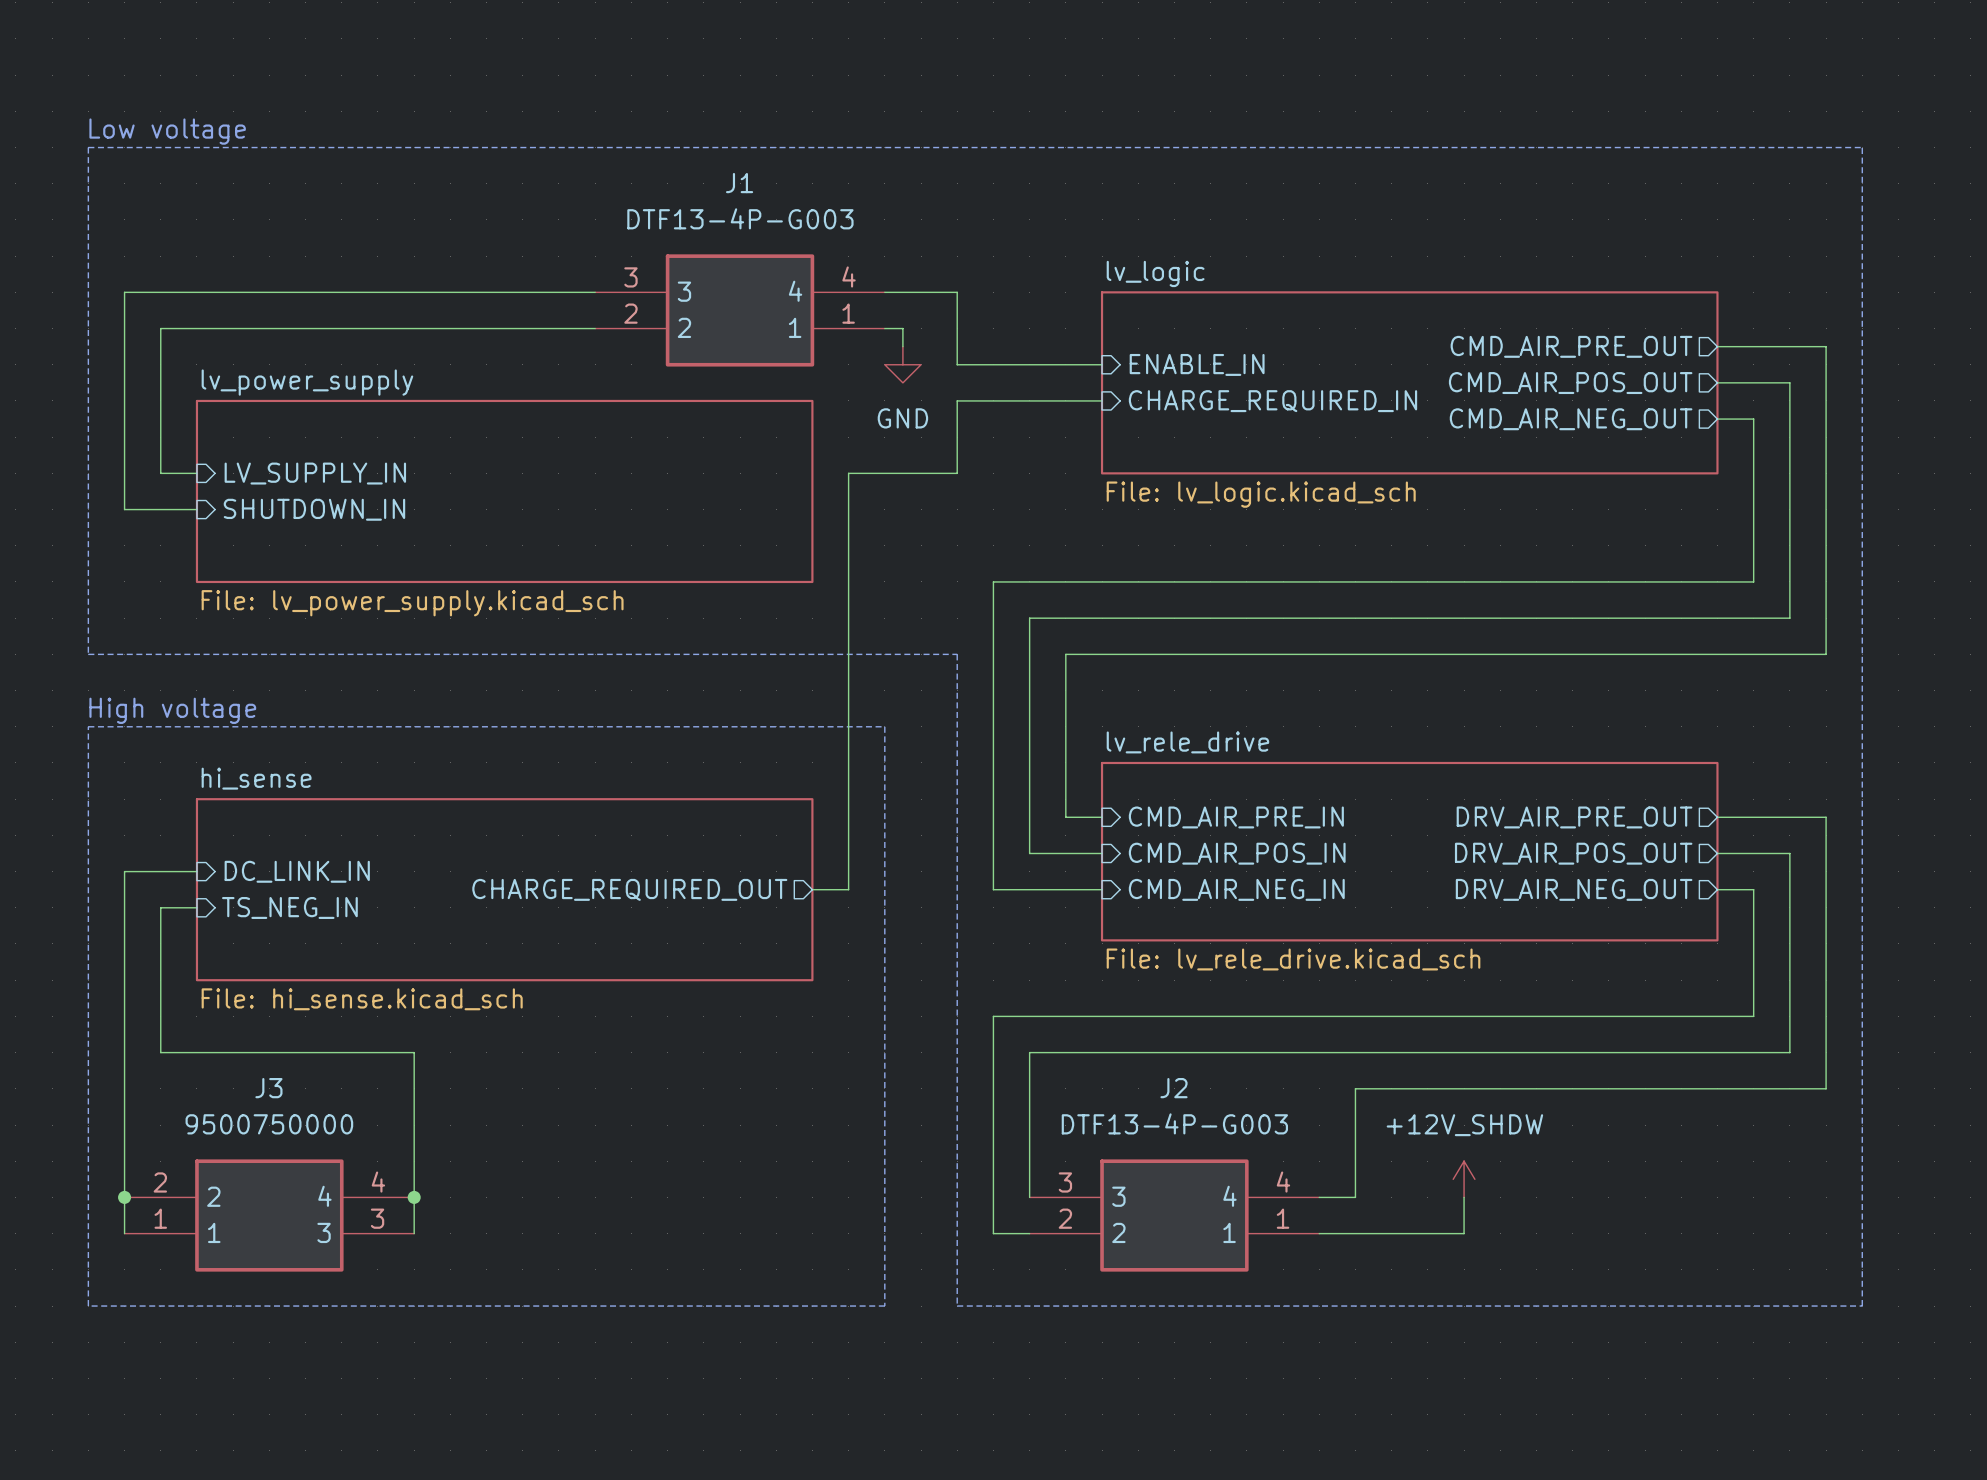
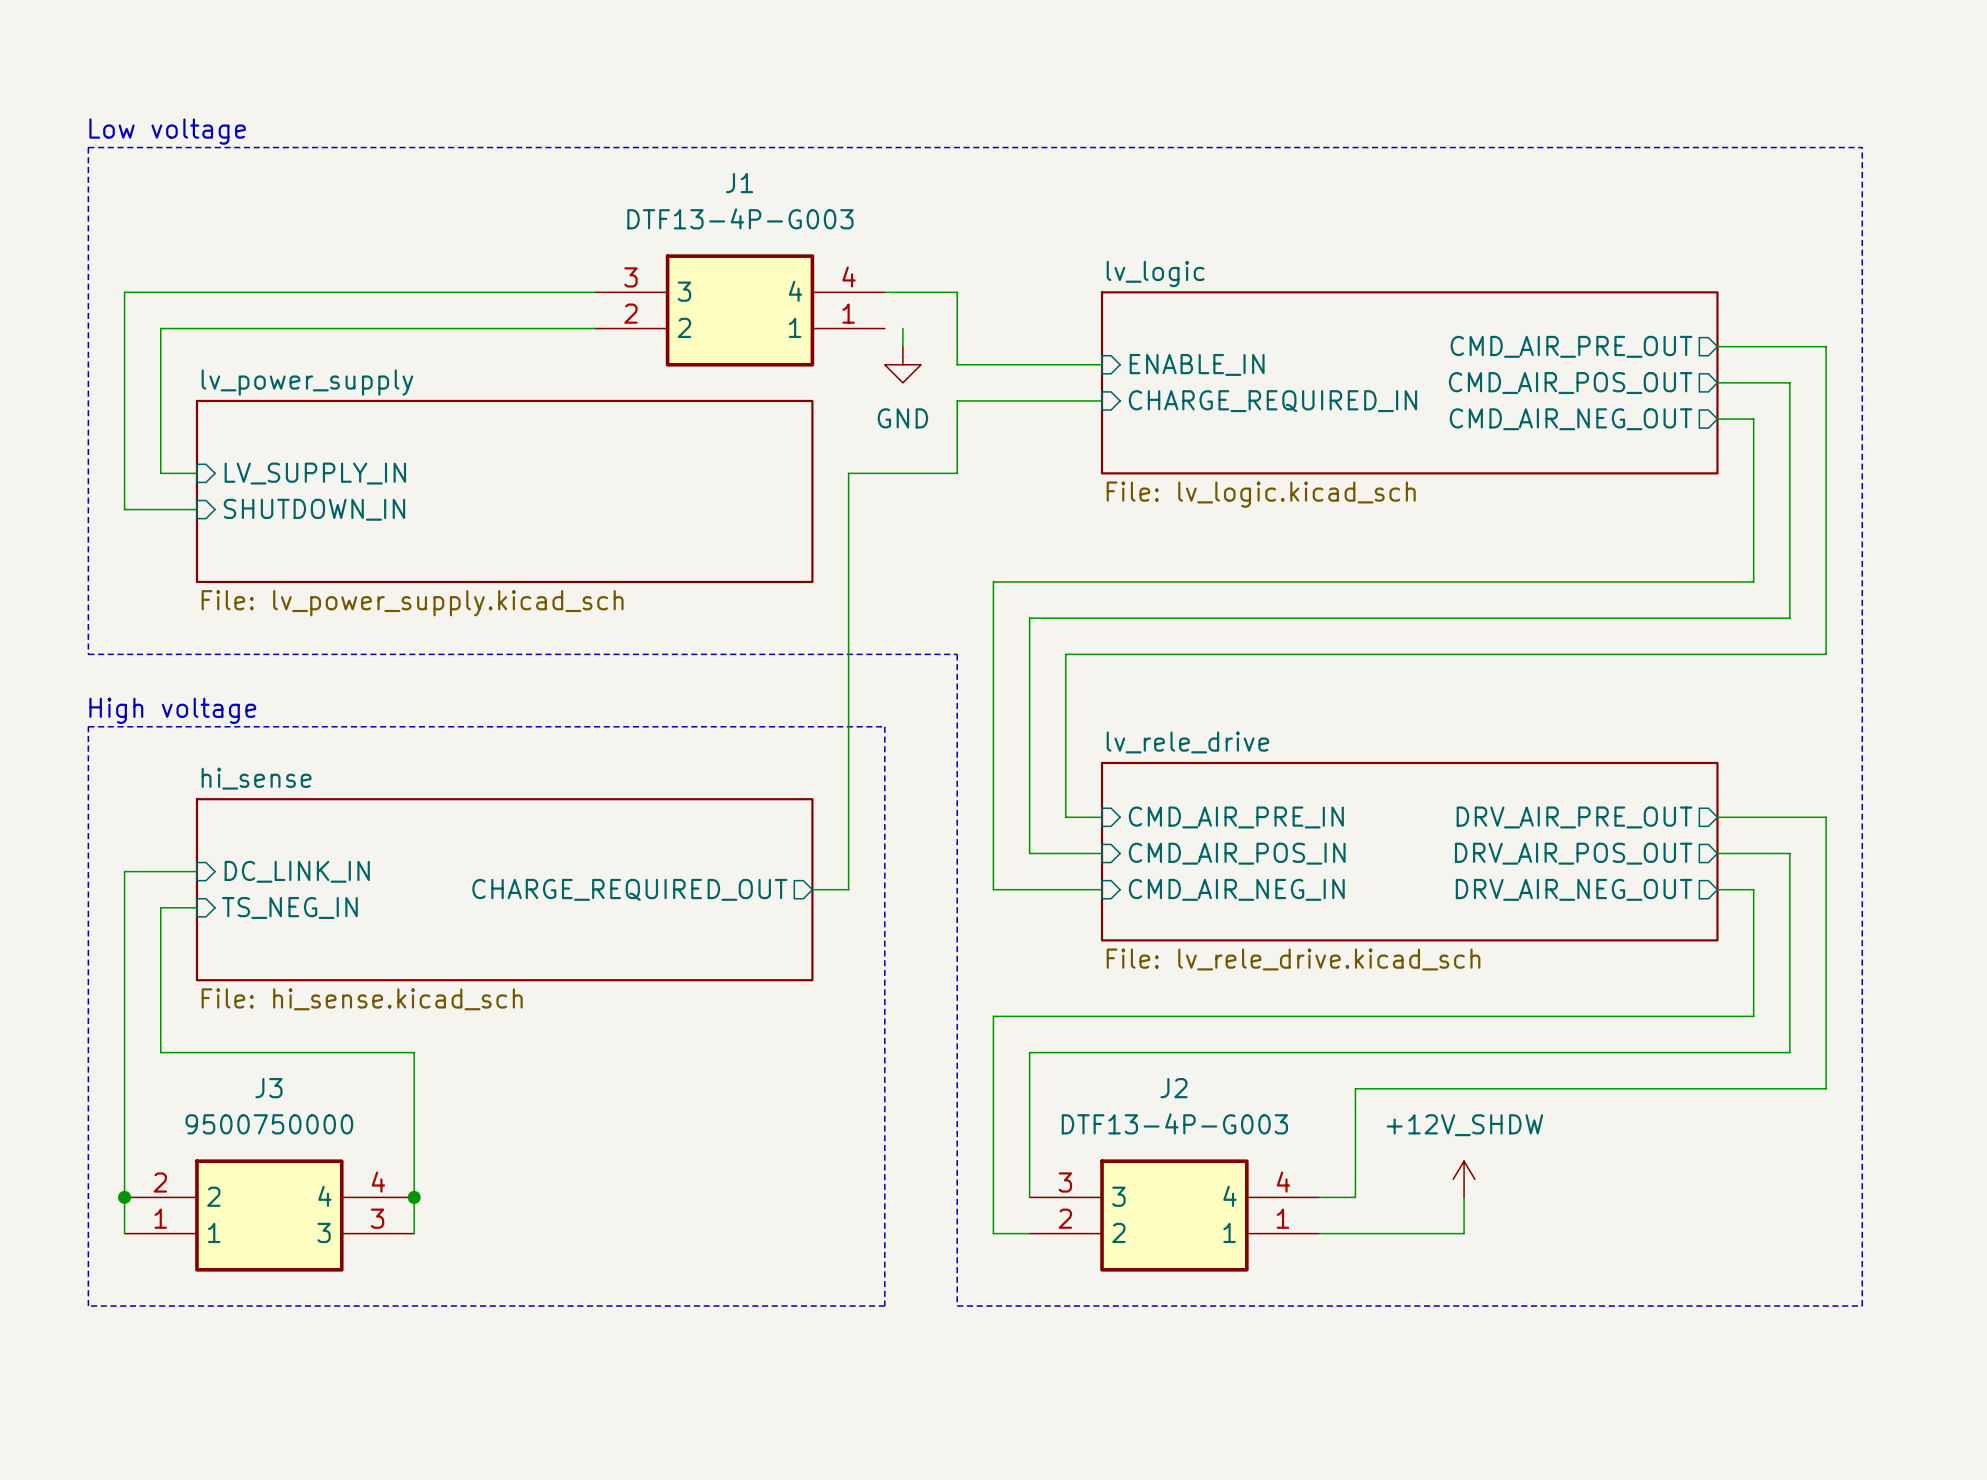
wire: (884, 328) (902, 328) -> none

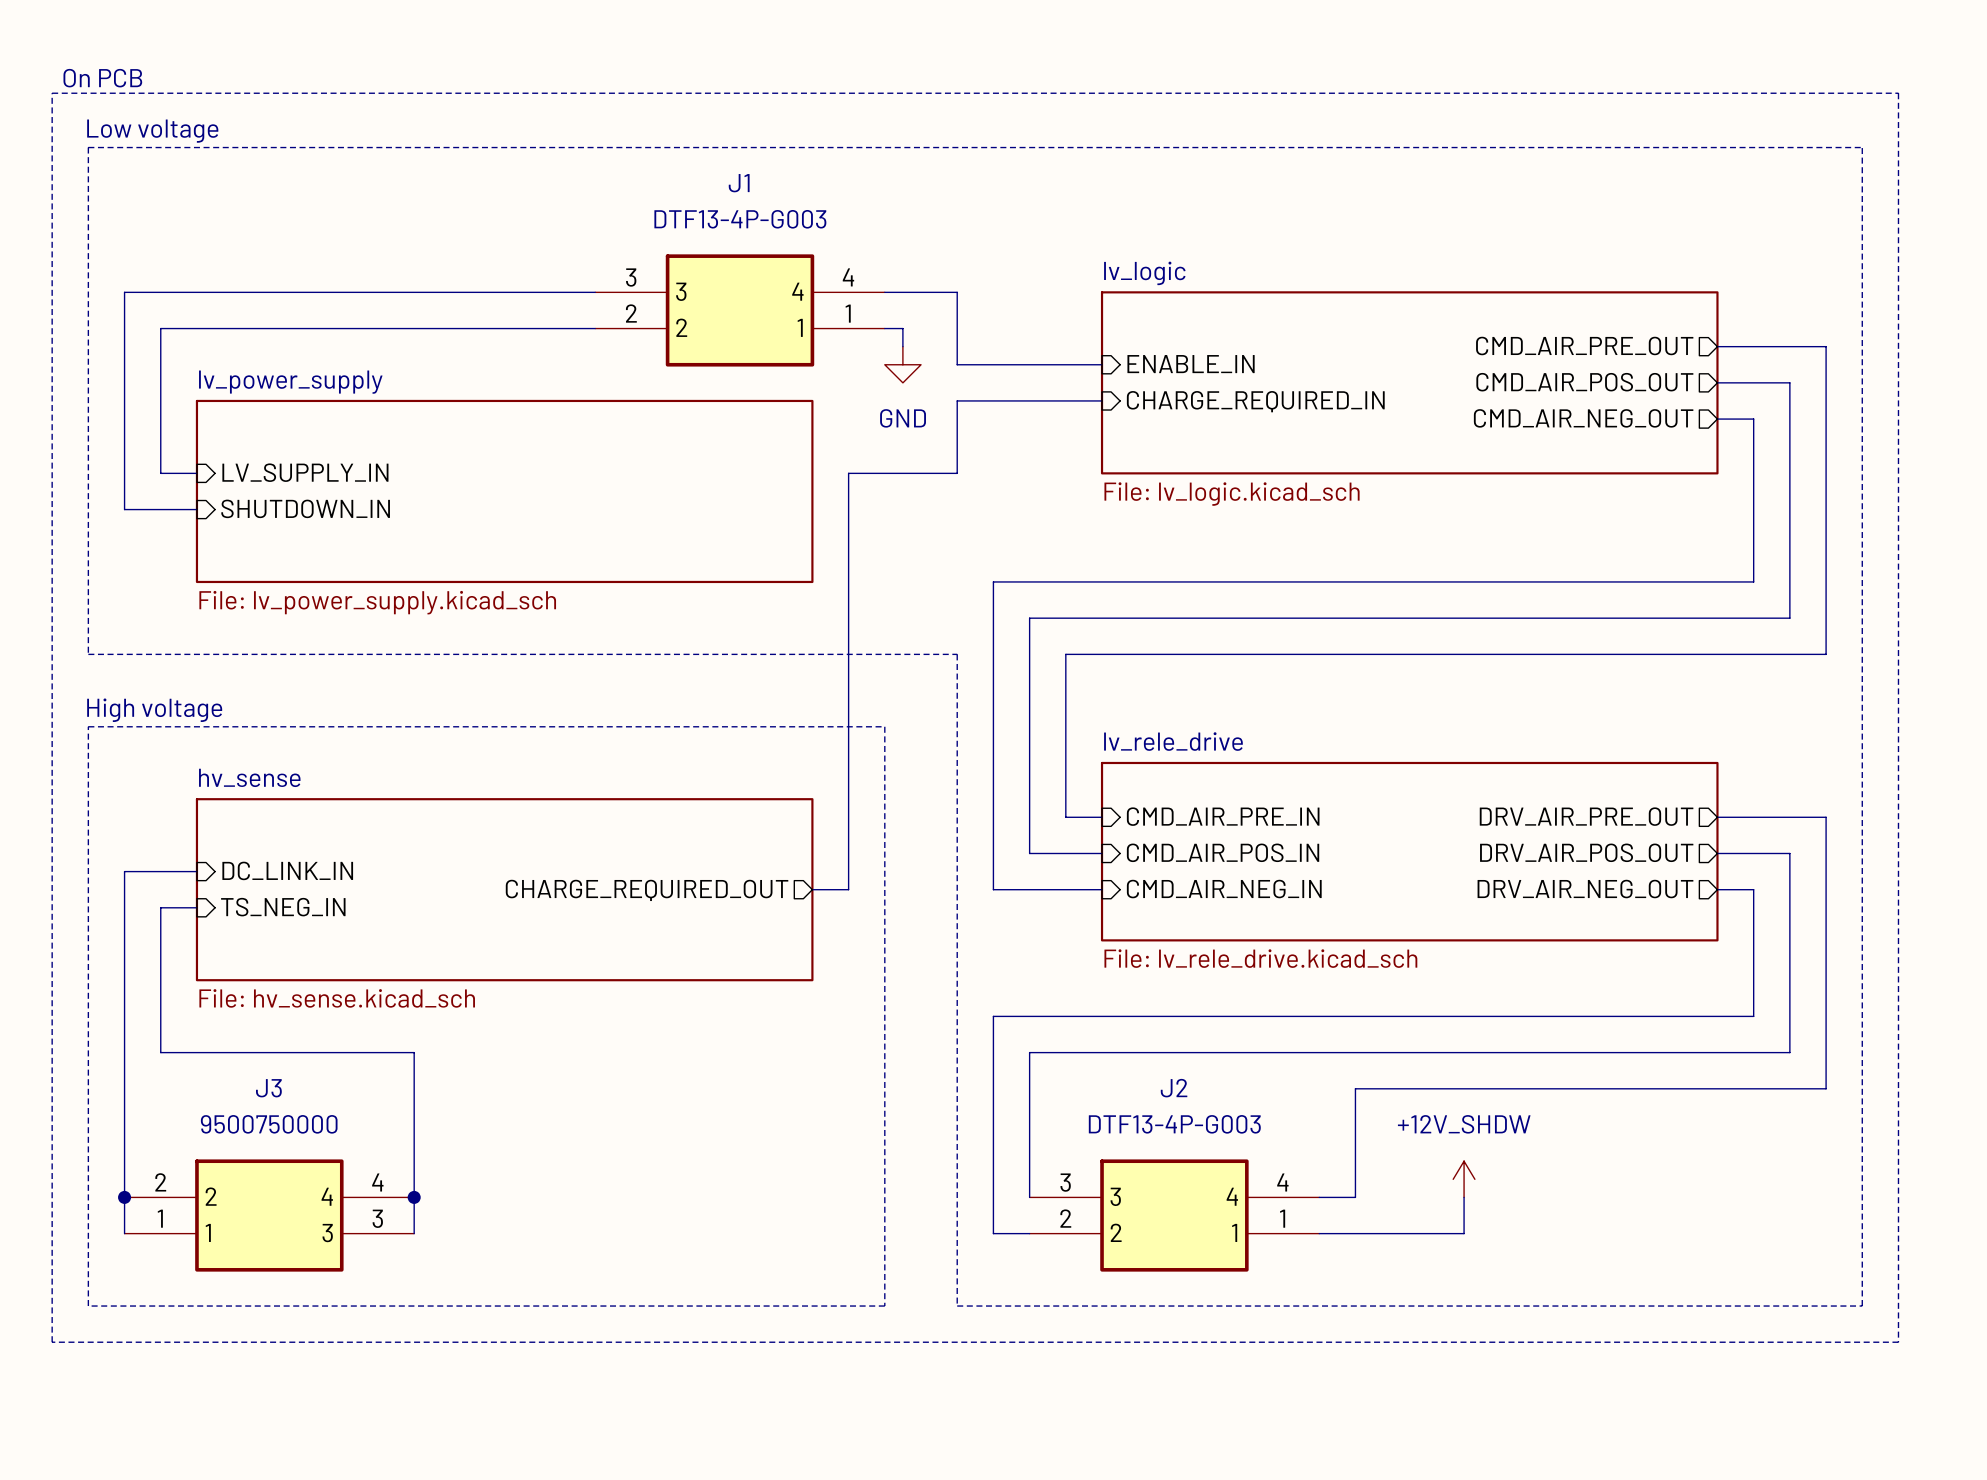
text: none -> On PCB (102, 78)
line: none -> (52, 93) (1898, 93) (1898, 1342) (52, 1342) (52, 93)
wire: none -> (884, 328) (902, 328)
sheet hi_sense name: hi_sense (256, 778) -> hv_sense (249, 777)
sheet hi_sense value: File: hi_sense.kicad_sch (362, 999) -> File: hv_sense.kicad_sch (337, 998)

